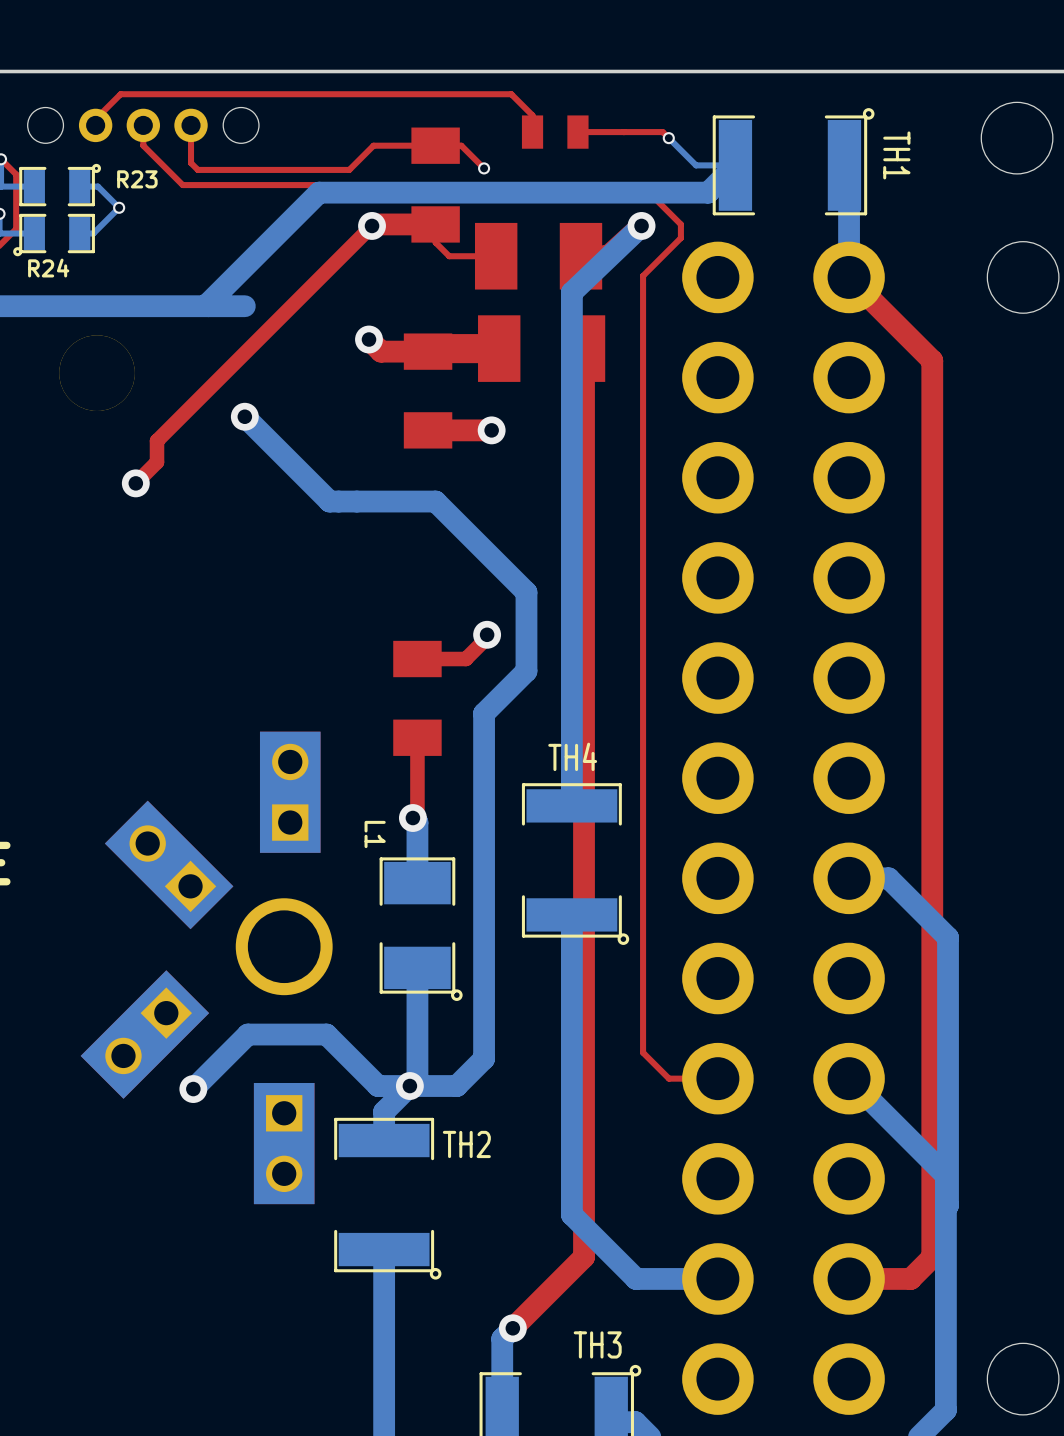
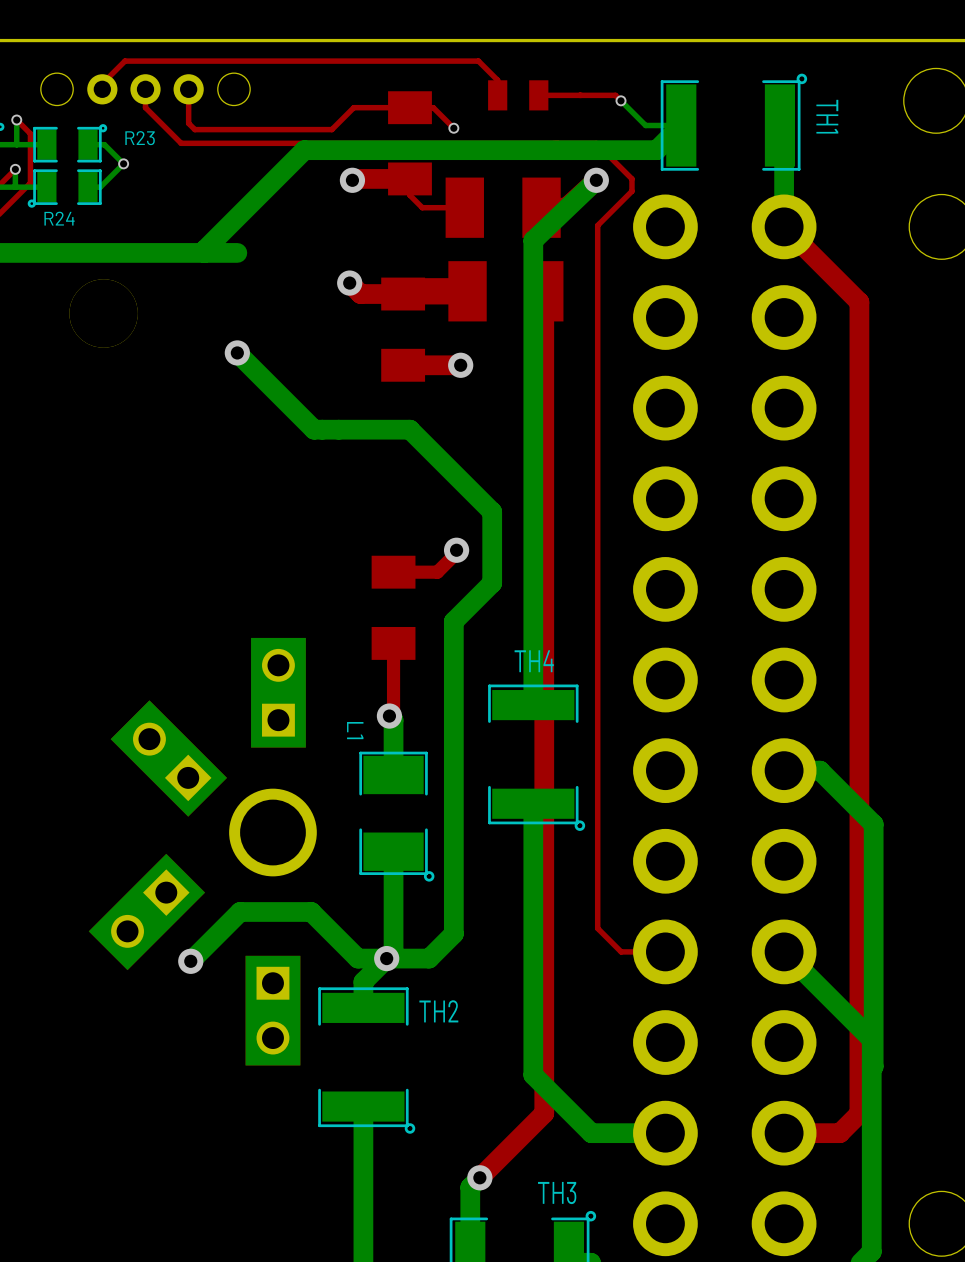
top track: (372, 225) (157, 440) (157, 462) (135, 483) -> none
via: (135, 483) -> none

